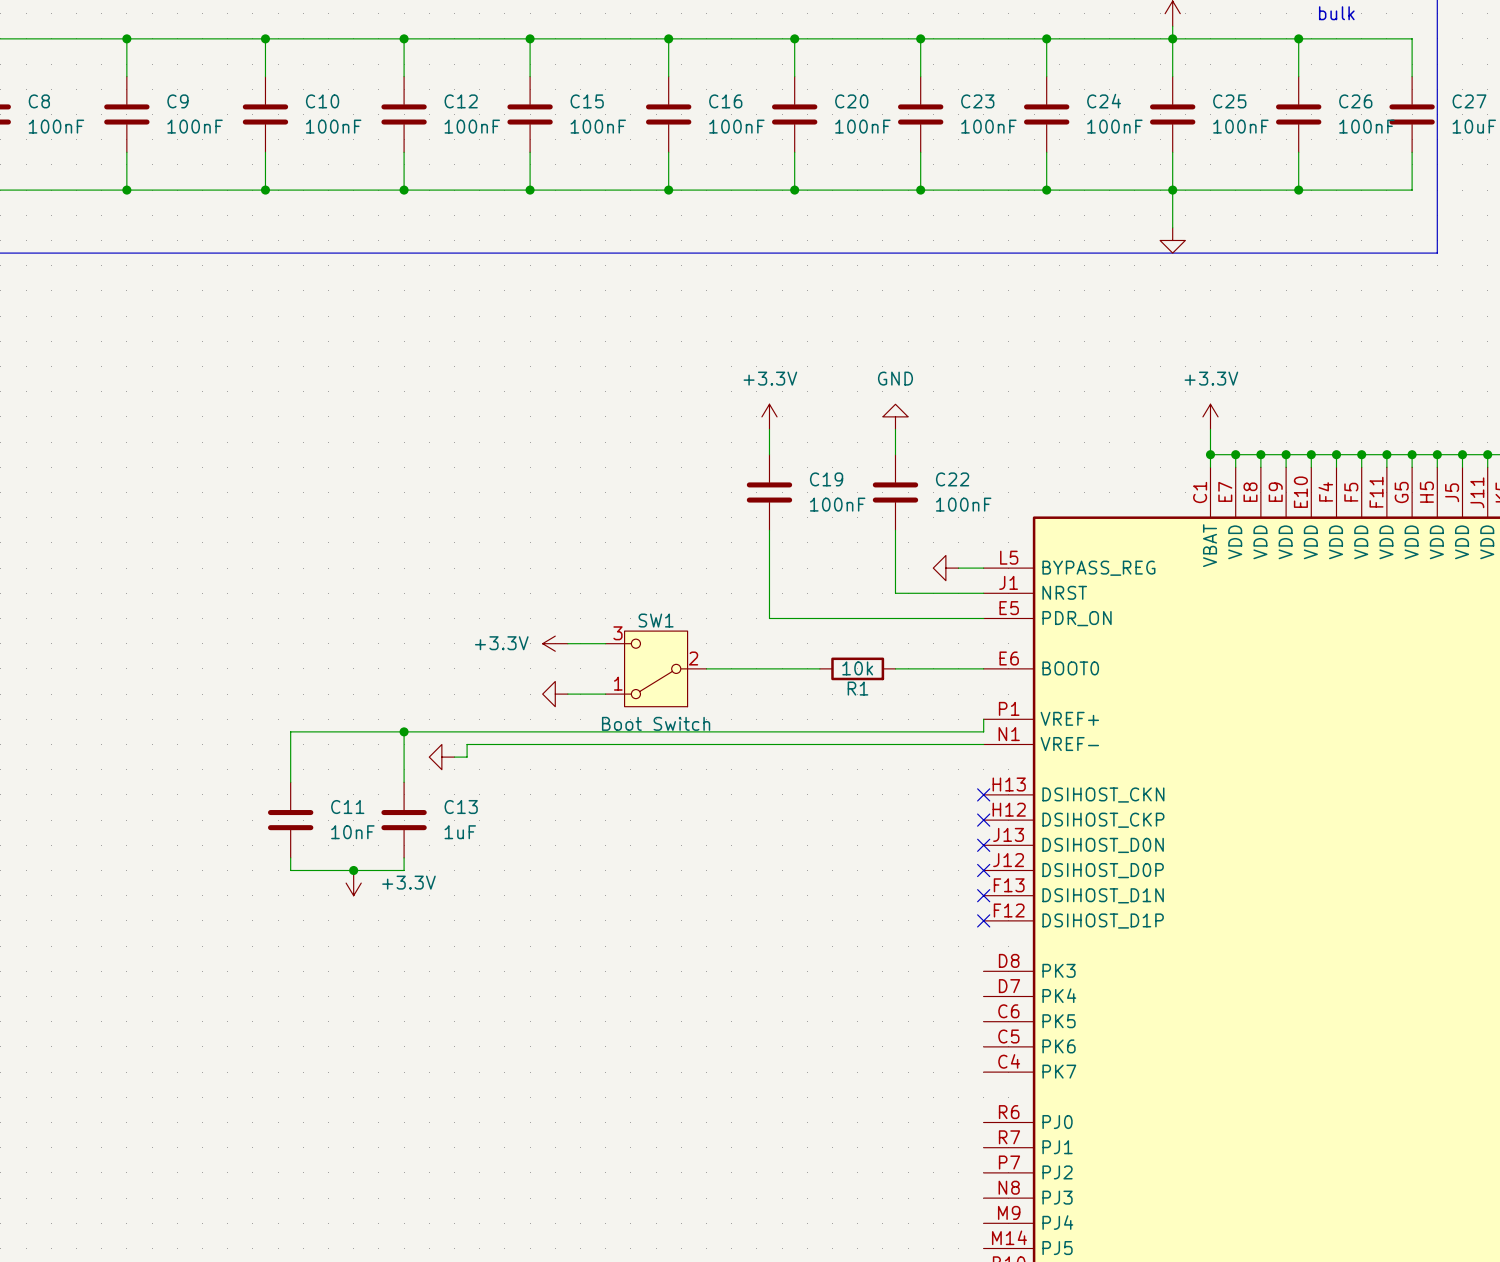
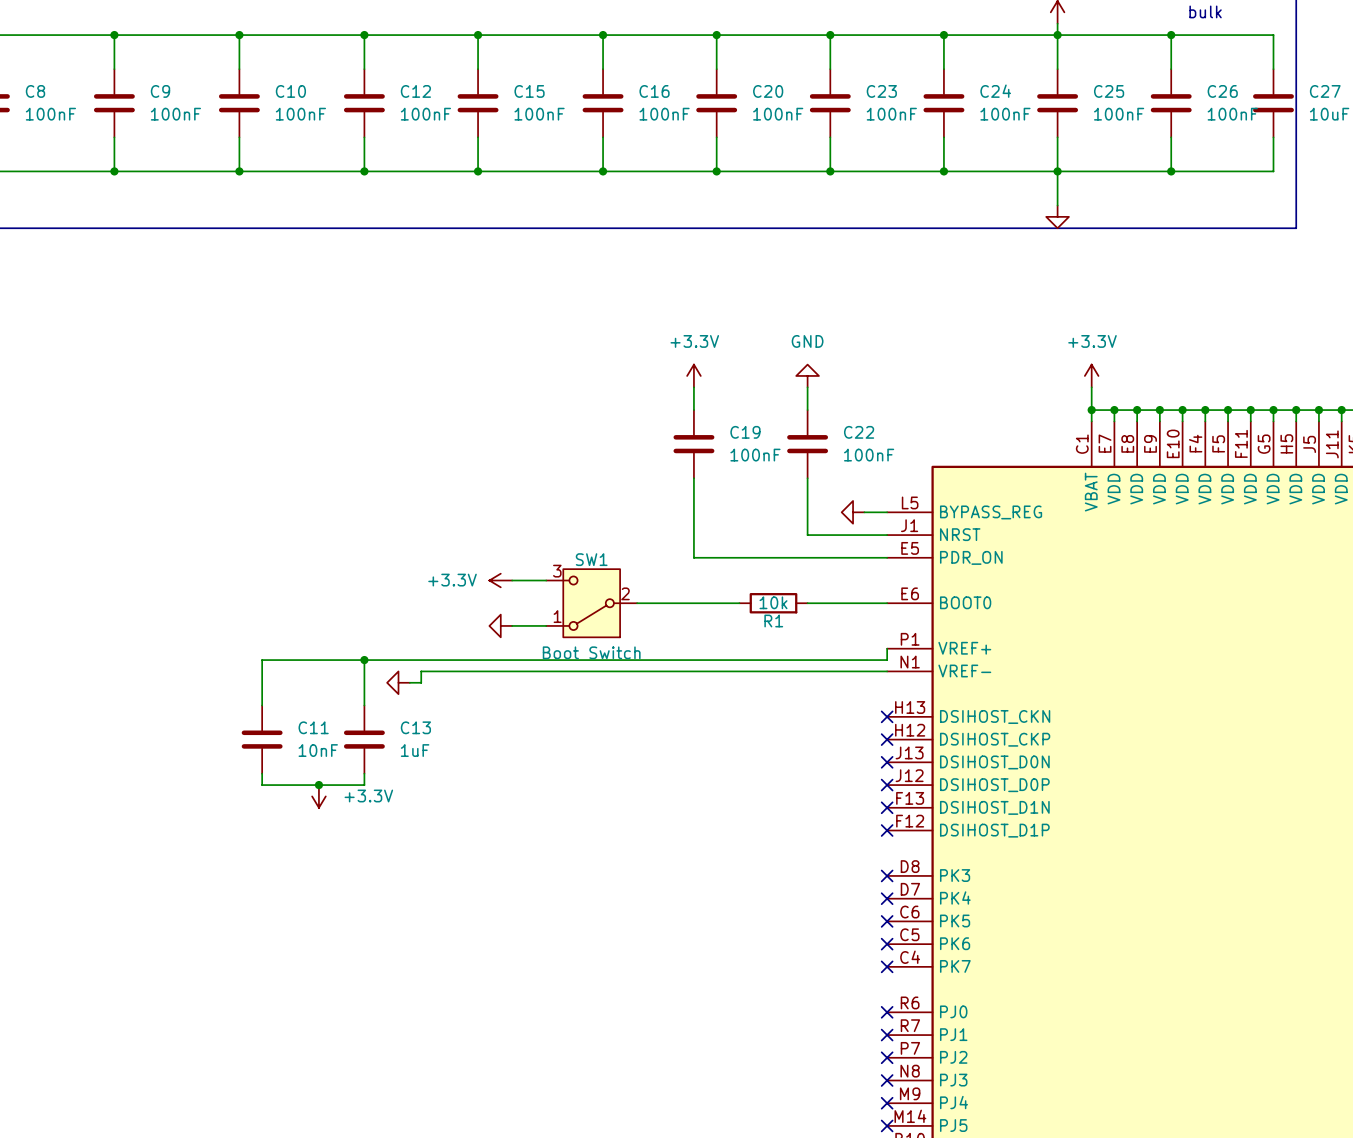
no-connect mark: none -> (887, 875)
no-connect mark: none -> (887, 898)
no-connect mark: none -> (887, 921)
no-connect mark: none -> (887, 944)
no-connect mark: none -> (887, 966)
no-connect mark: none -> (887, 1012)
no-connect mark: none -> (887, 1035)
no-connect mark: none -> (887, 1057)
no-connect mark: none -> (887, 1080)
no-connect mark: none -> (887, 1103)
no-connect mark: none -> (887, 1125)

